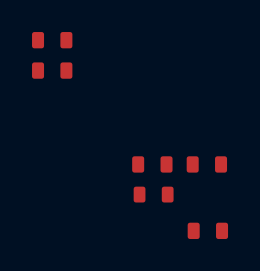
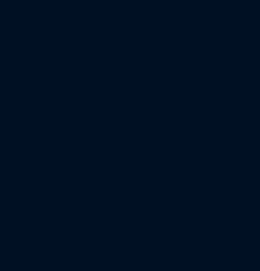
part: (52, 40) -> none
part: (52, 70) -> none
part: (152, 164) -> none
part: (206, 164) -> none
part: (153, 194) -> none
part: (207, 230) -> none

